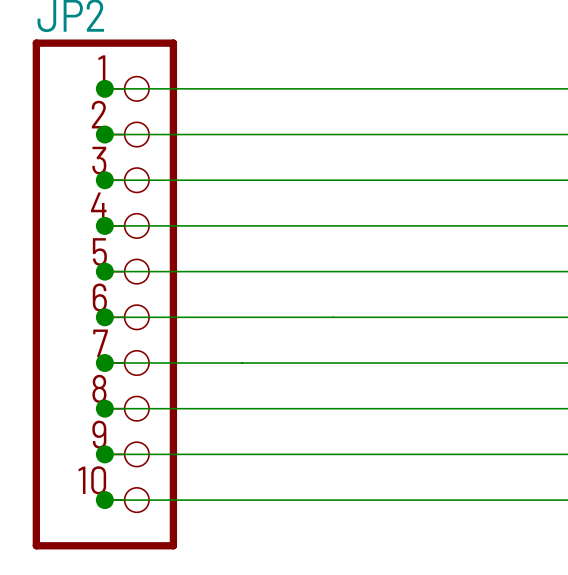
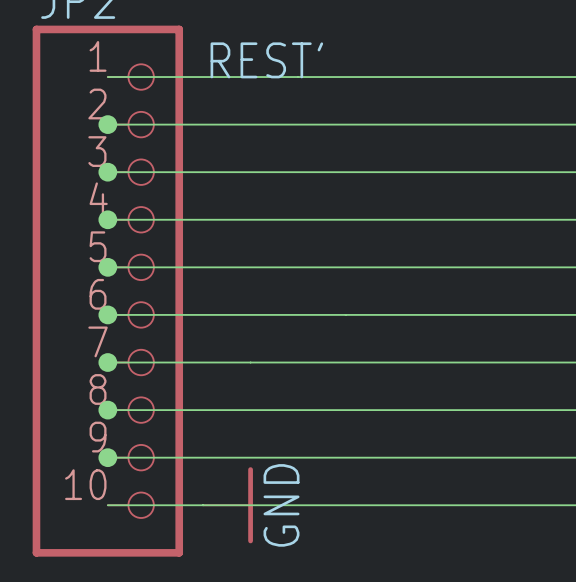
text: none -> REST' (266, 60)
junction: (104, 88) -> none
junction: (104, 500) -> none
power symbol: none -> GND (227, 505)

